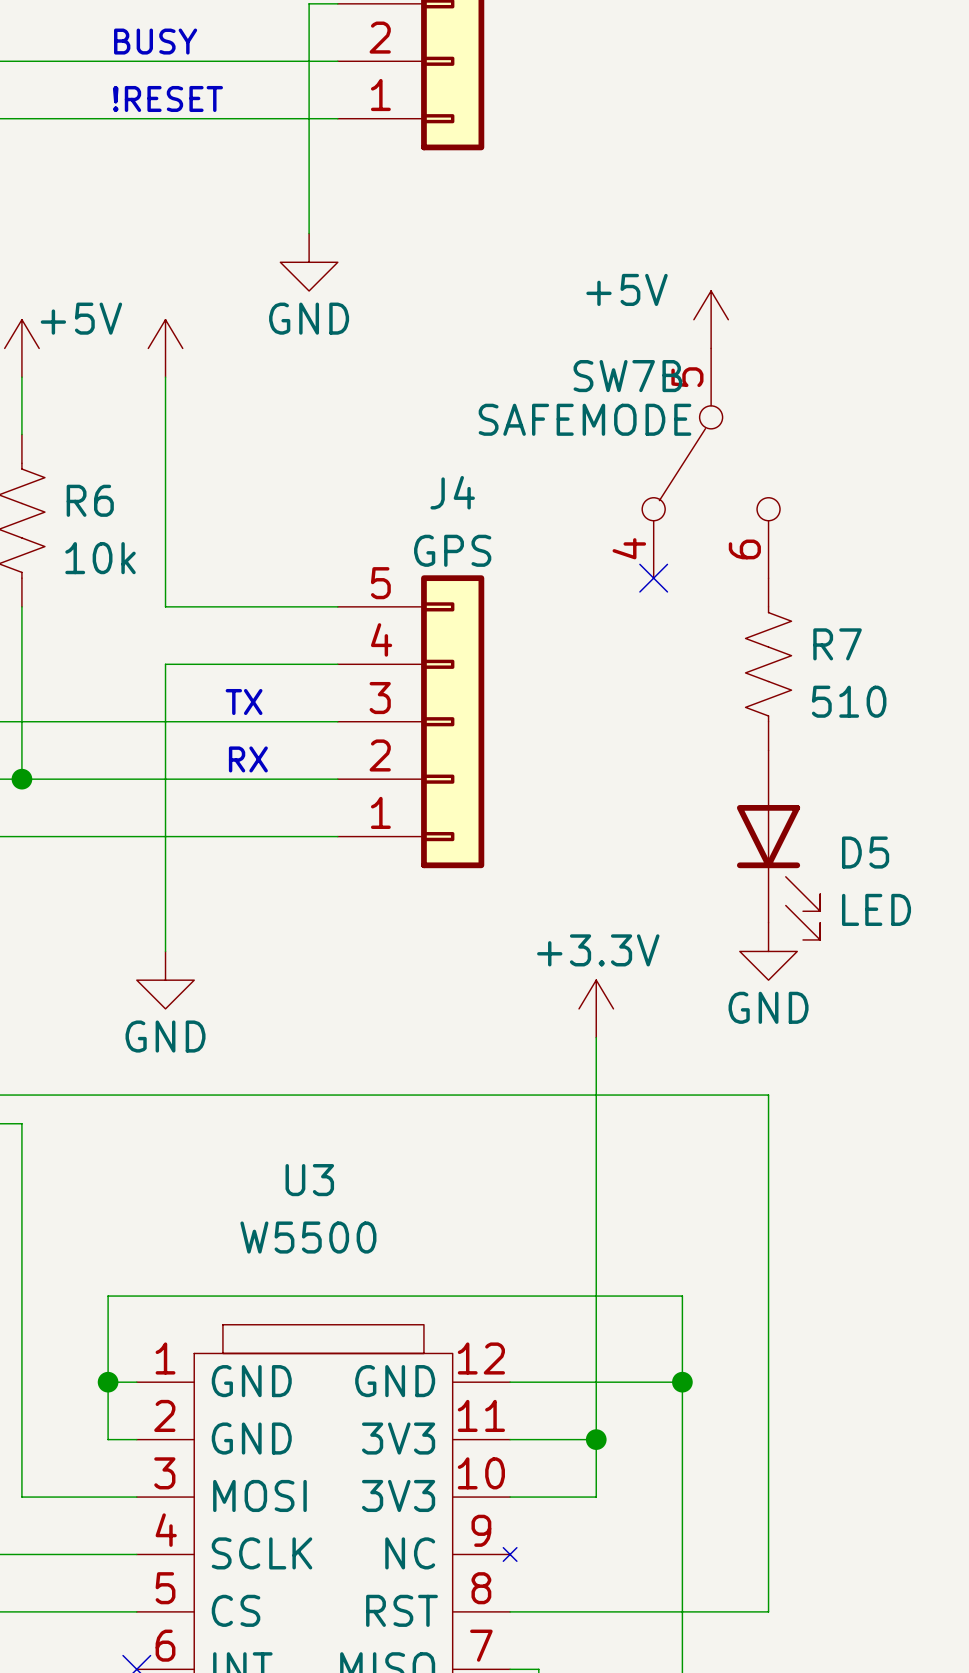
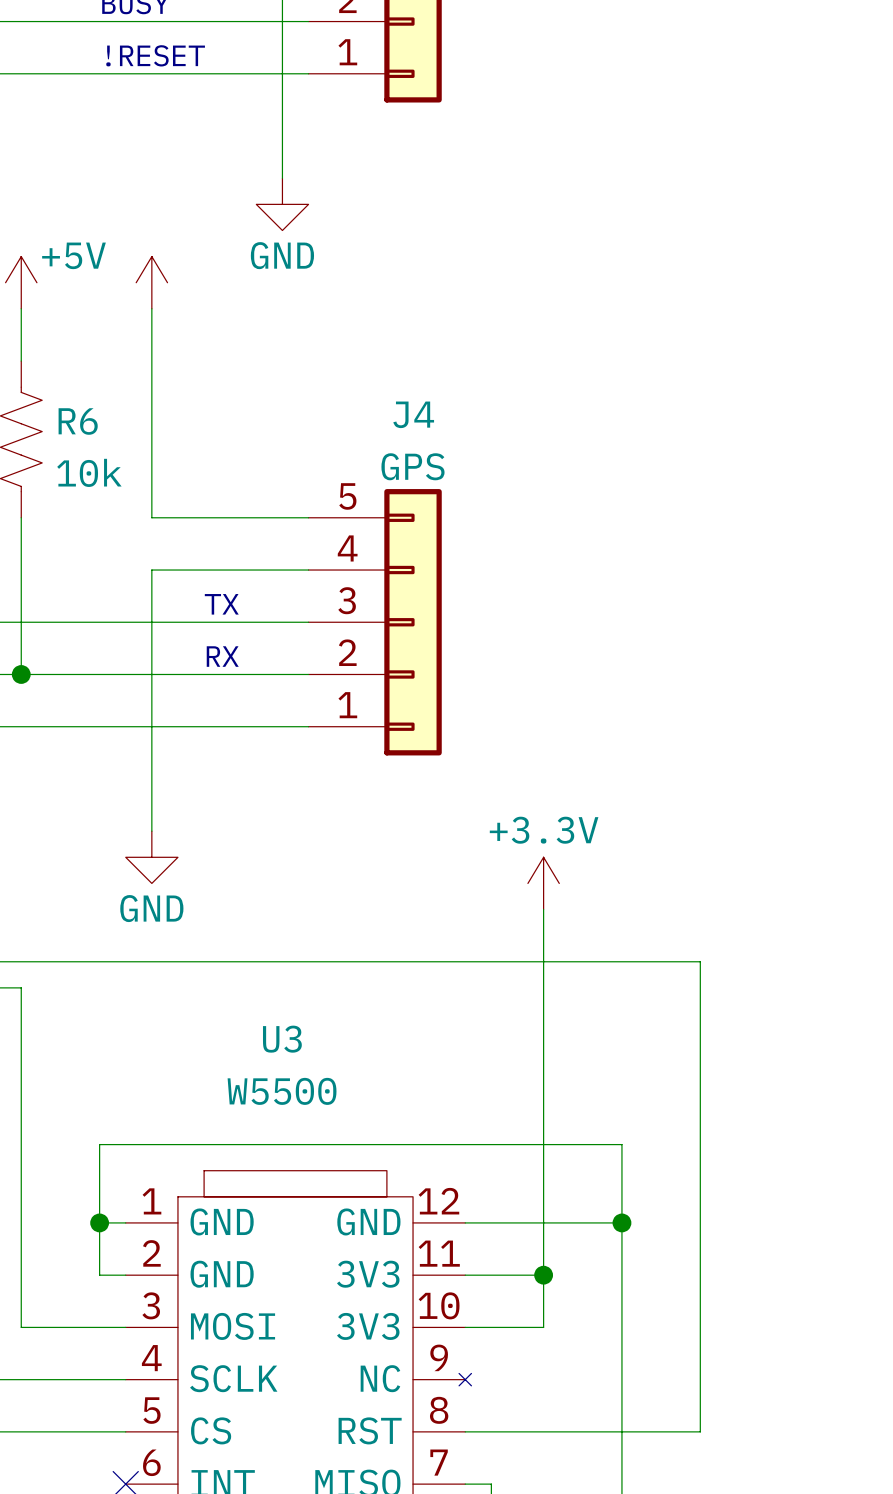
power symbol: +5V (711, 319) -> none
SW7B: SAFEMODE (711, 463) -> none
no-connect mark: (653, 578) -> none
R7: 510 (768, 664) -> none
D5: LED (778, 845) -> none
power symbol: GND (768, 951) -> none

